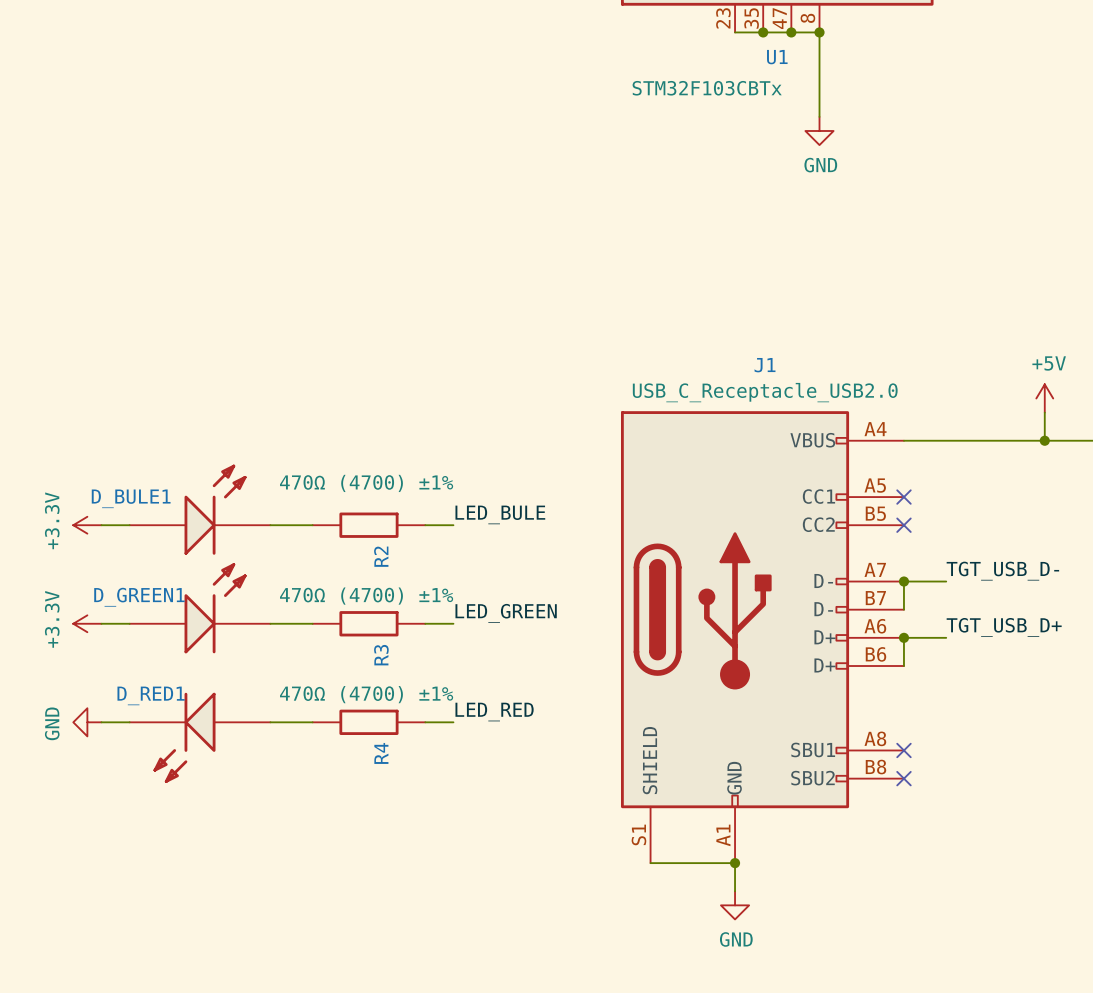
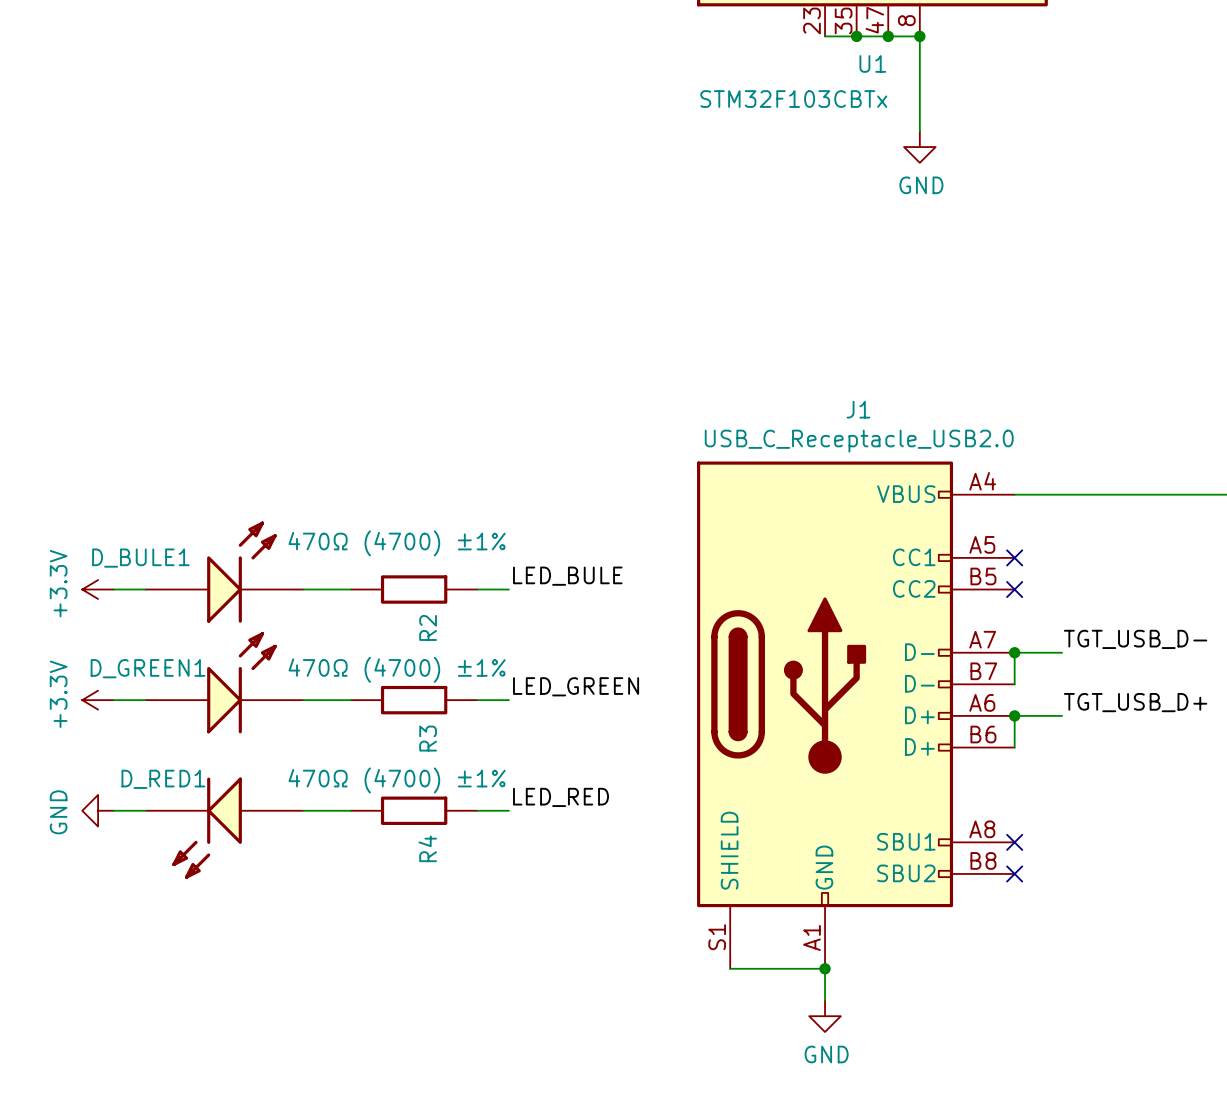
power symbol: +5V (1044, 398) -> none
wire: (1044, 412) (1044, 440) -> none
junction: (1044, 440) -> none

